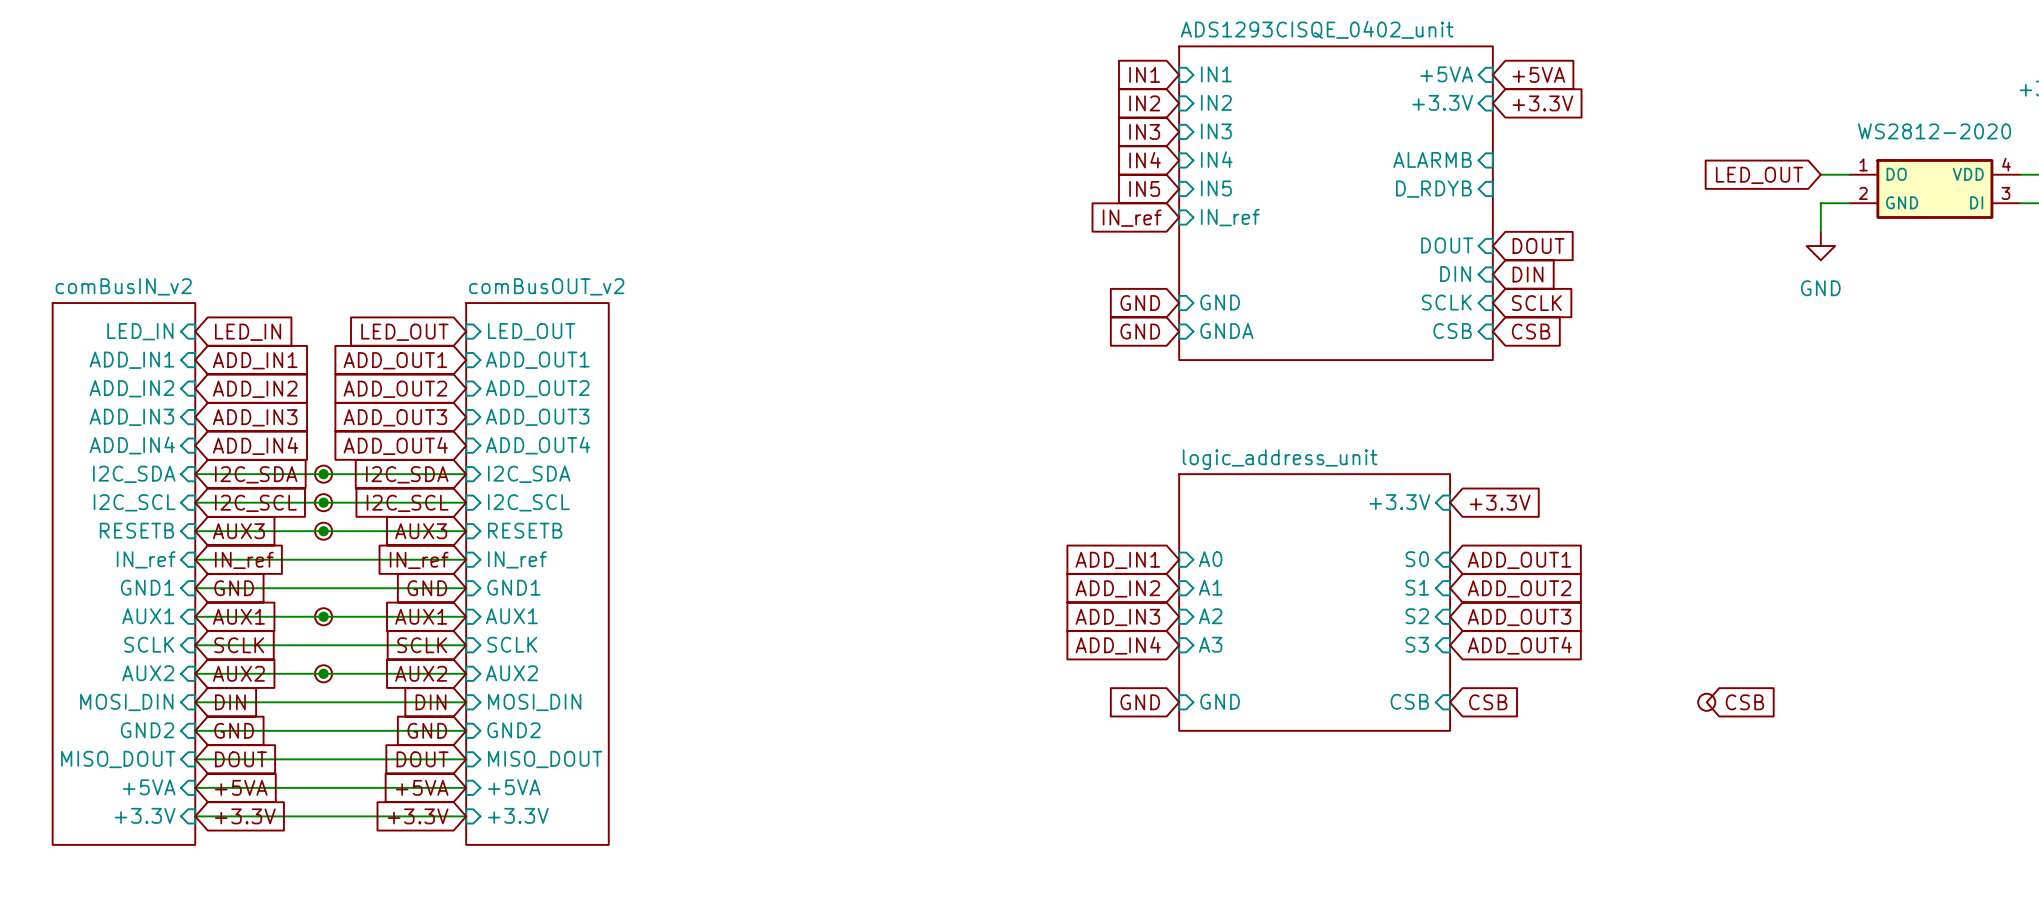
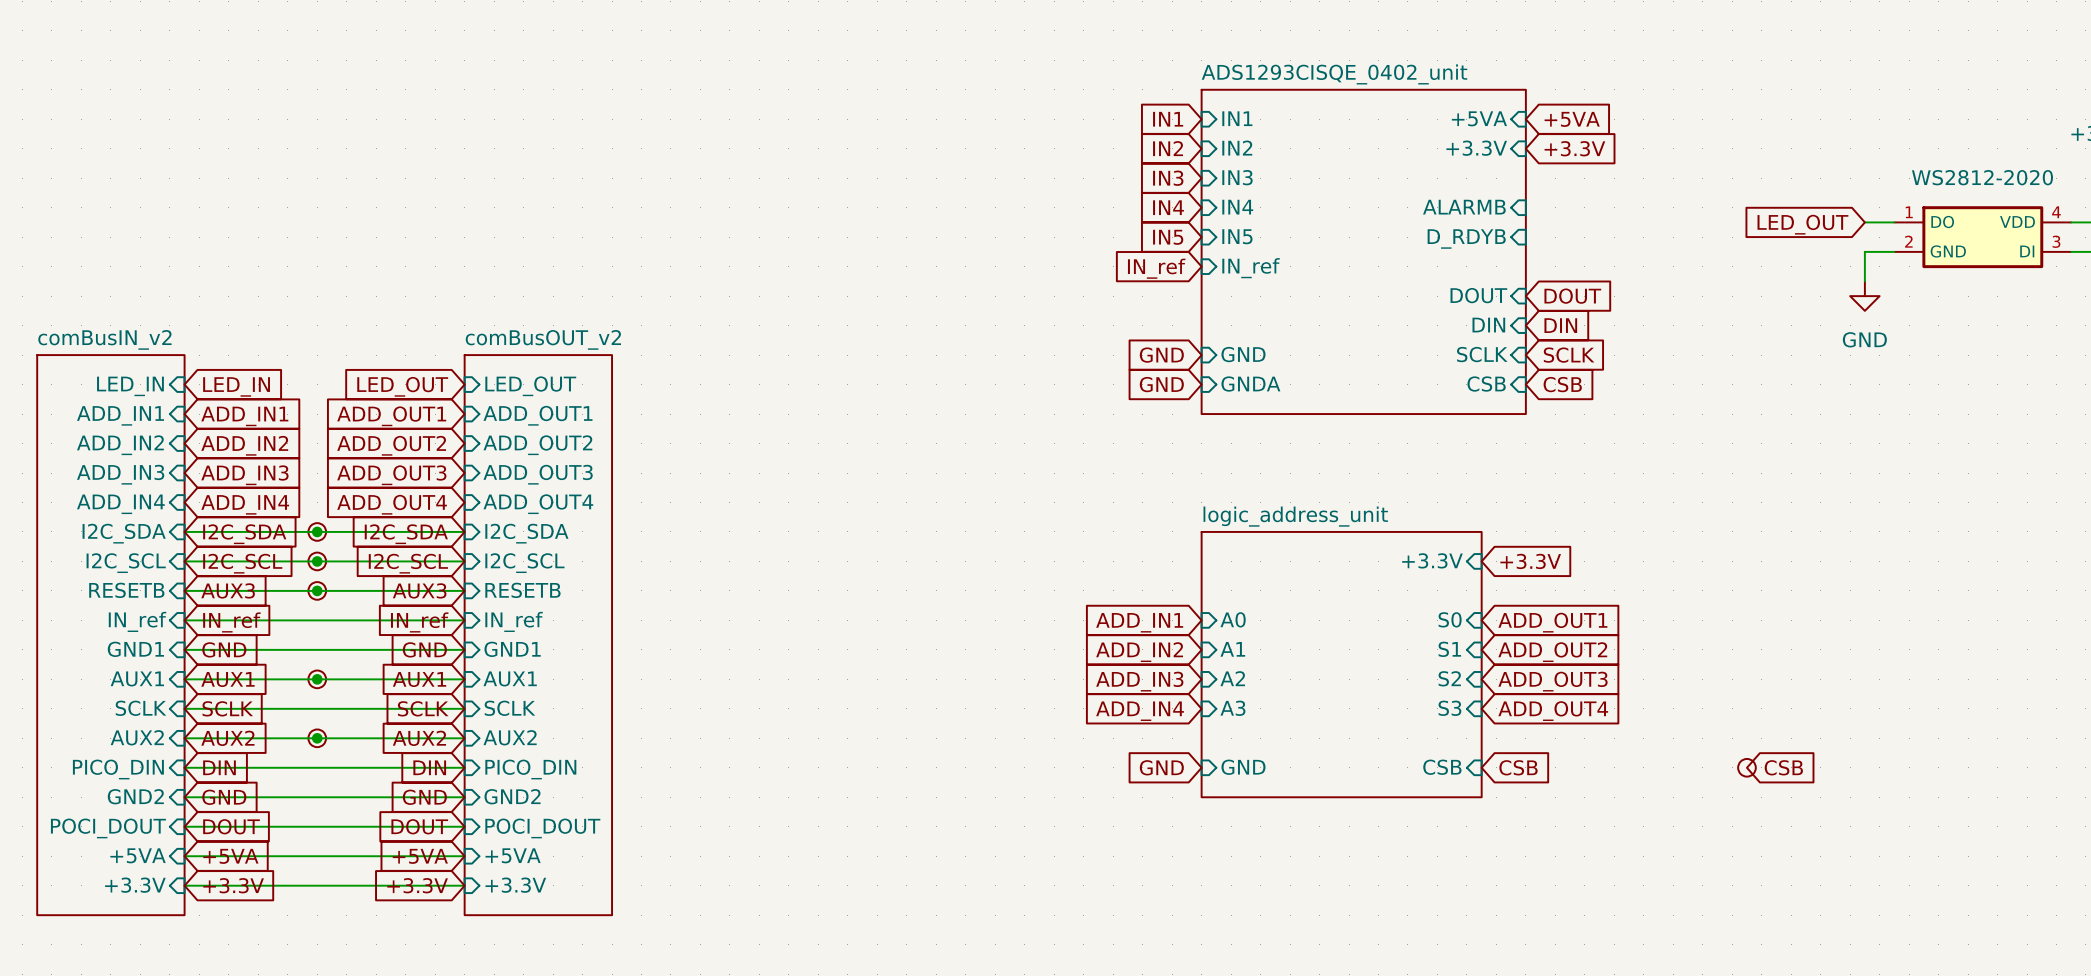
sheet pin: MOSI_DIN (126, 702) -> PICO_DIN (118, 769)
sheet pin: MOSI_DIN (534, 702) -> PICO_DIN (530, 769)
sheet pin: MISO_DOUT (118, 759) -> POCI_DOUT (108, 828)
sheet pin: MISO_DOUT (545, 759) -> POCI_DOUT (542, 828)

